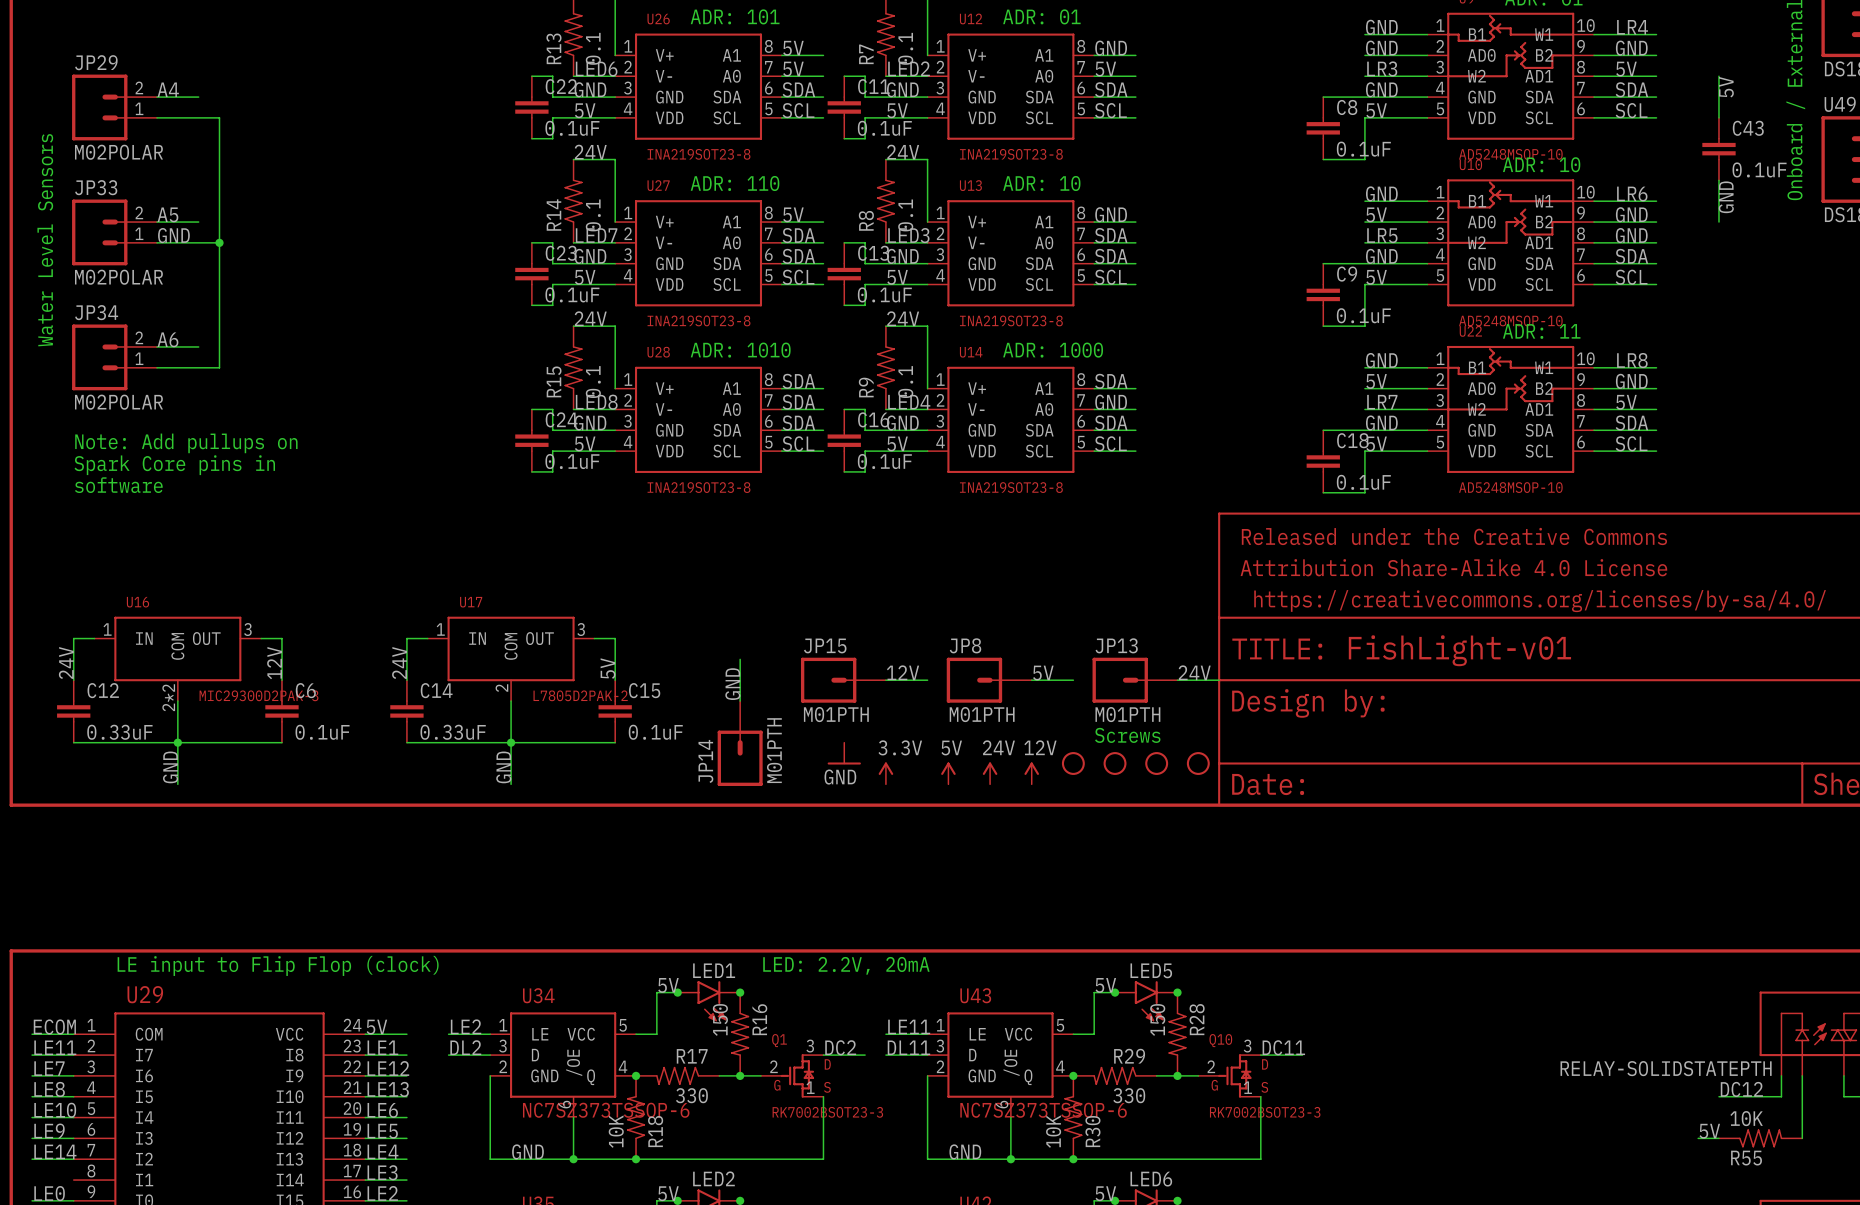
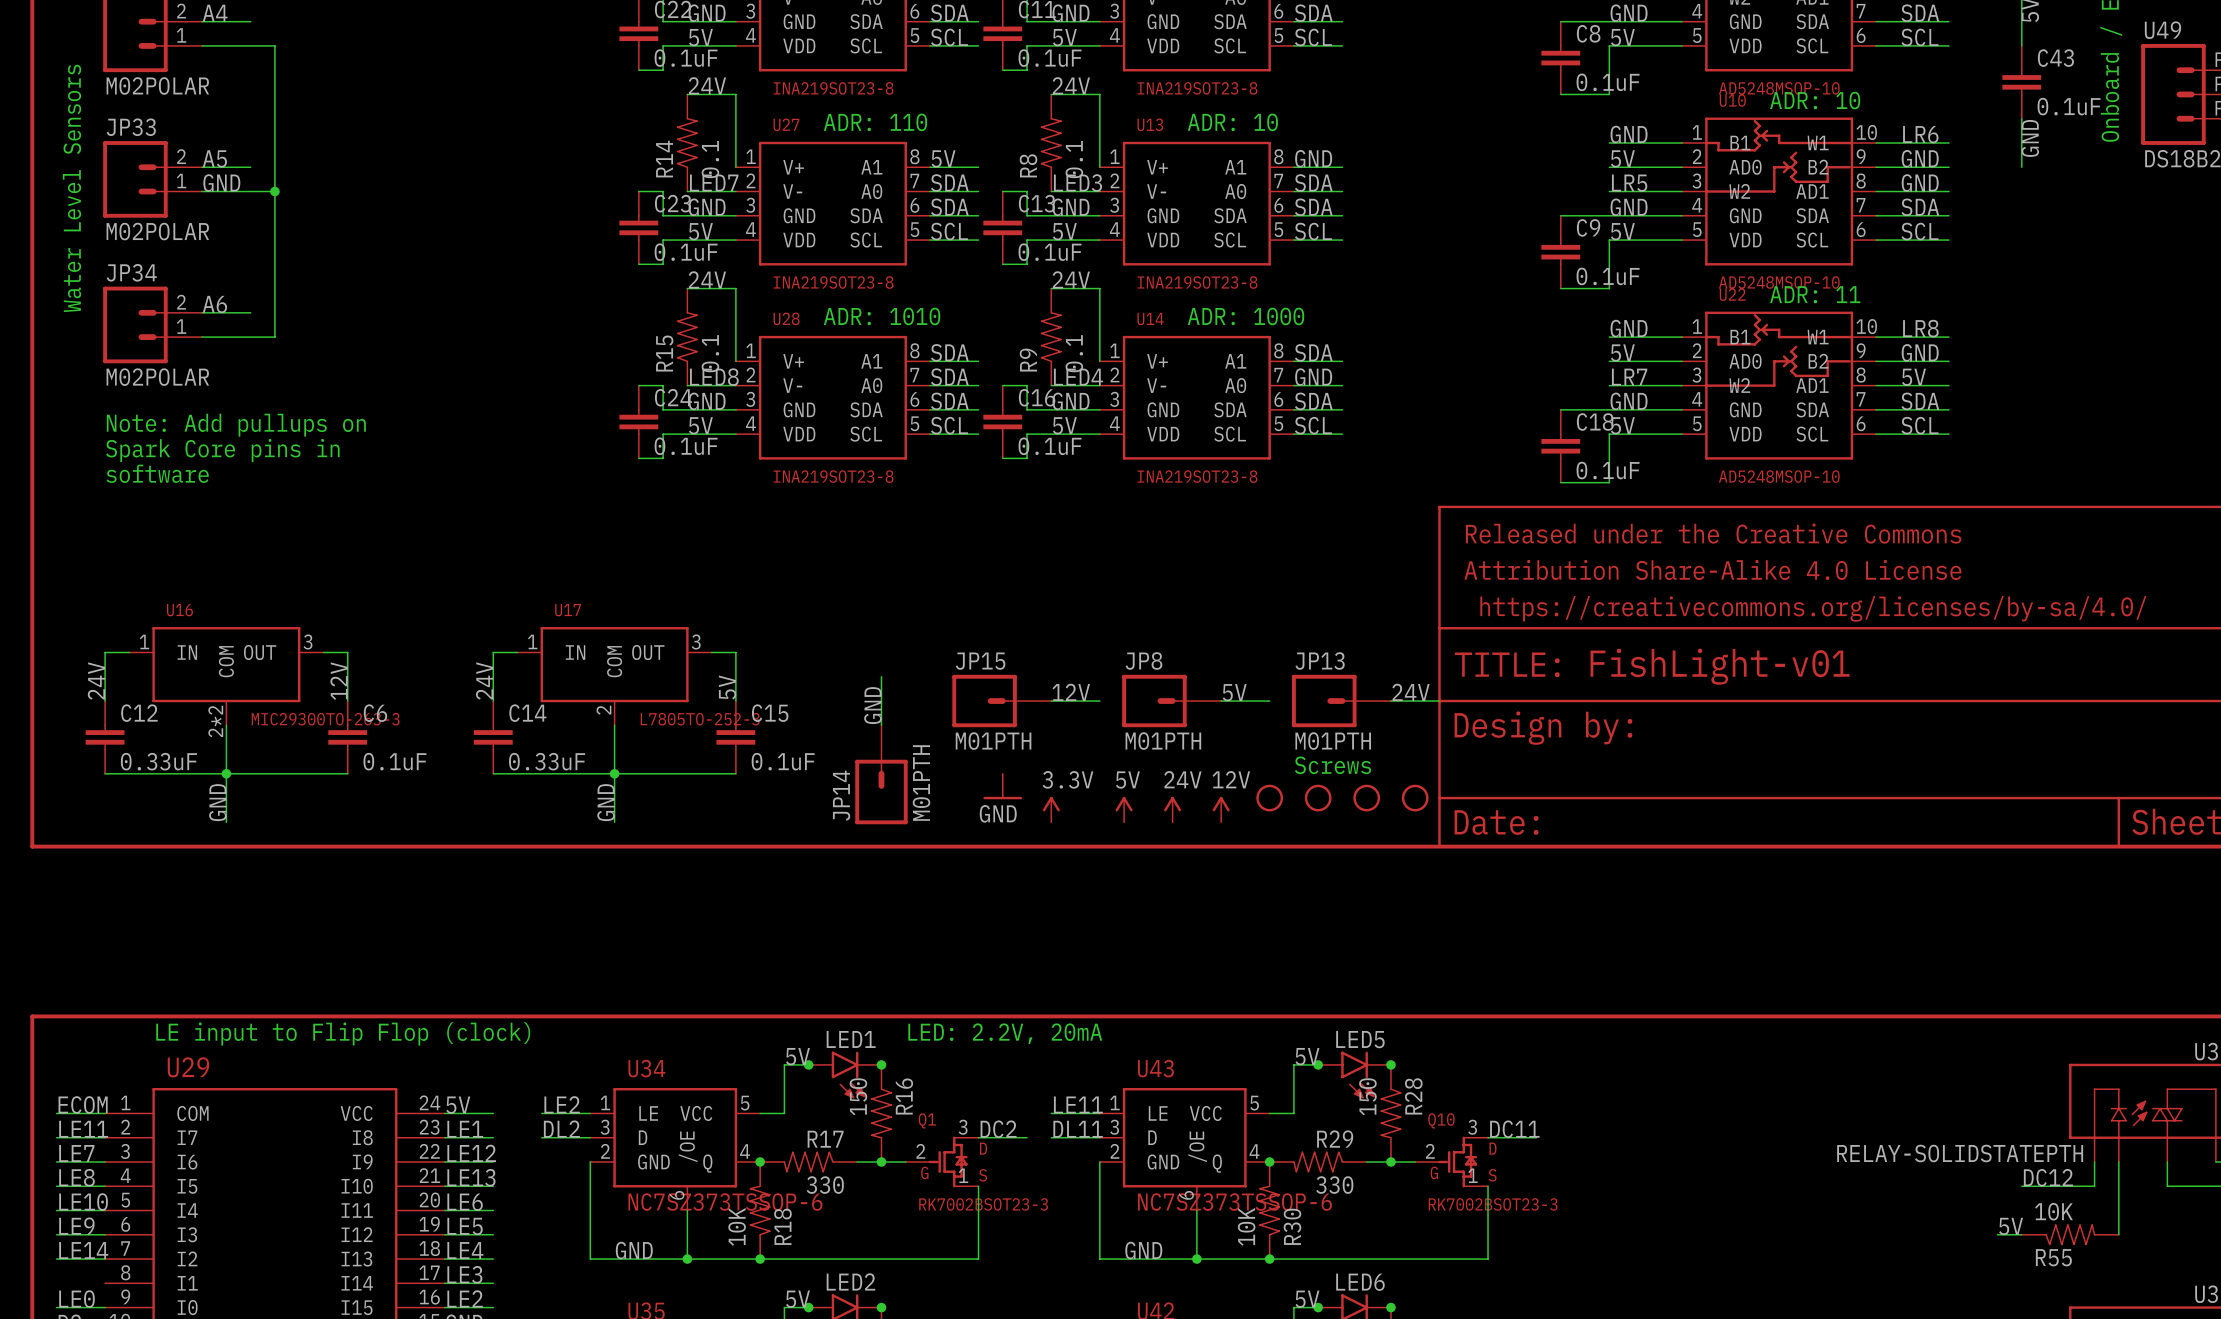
U16 value: MIC29300D2PAK-3 (259, 695) -> MIC29300TO-263-3 (325, 719)
U17 value: L7805D2PAK-2 (580, 695) -> L7805TO-252-3 (700, 719)

